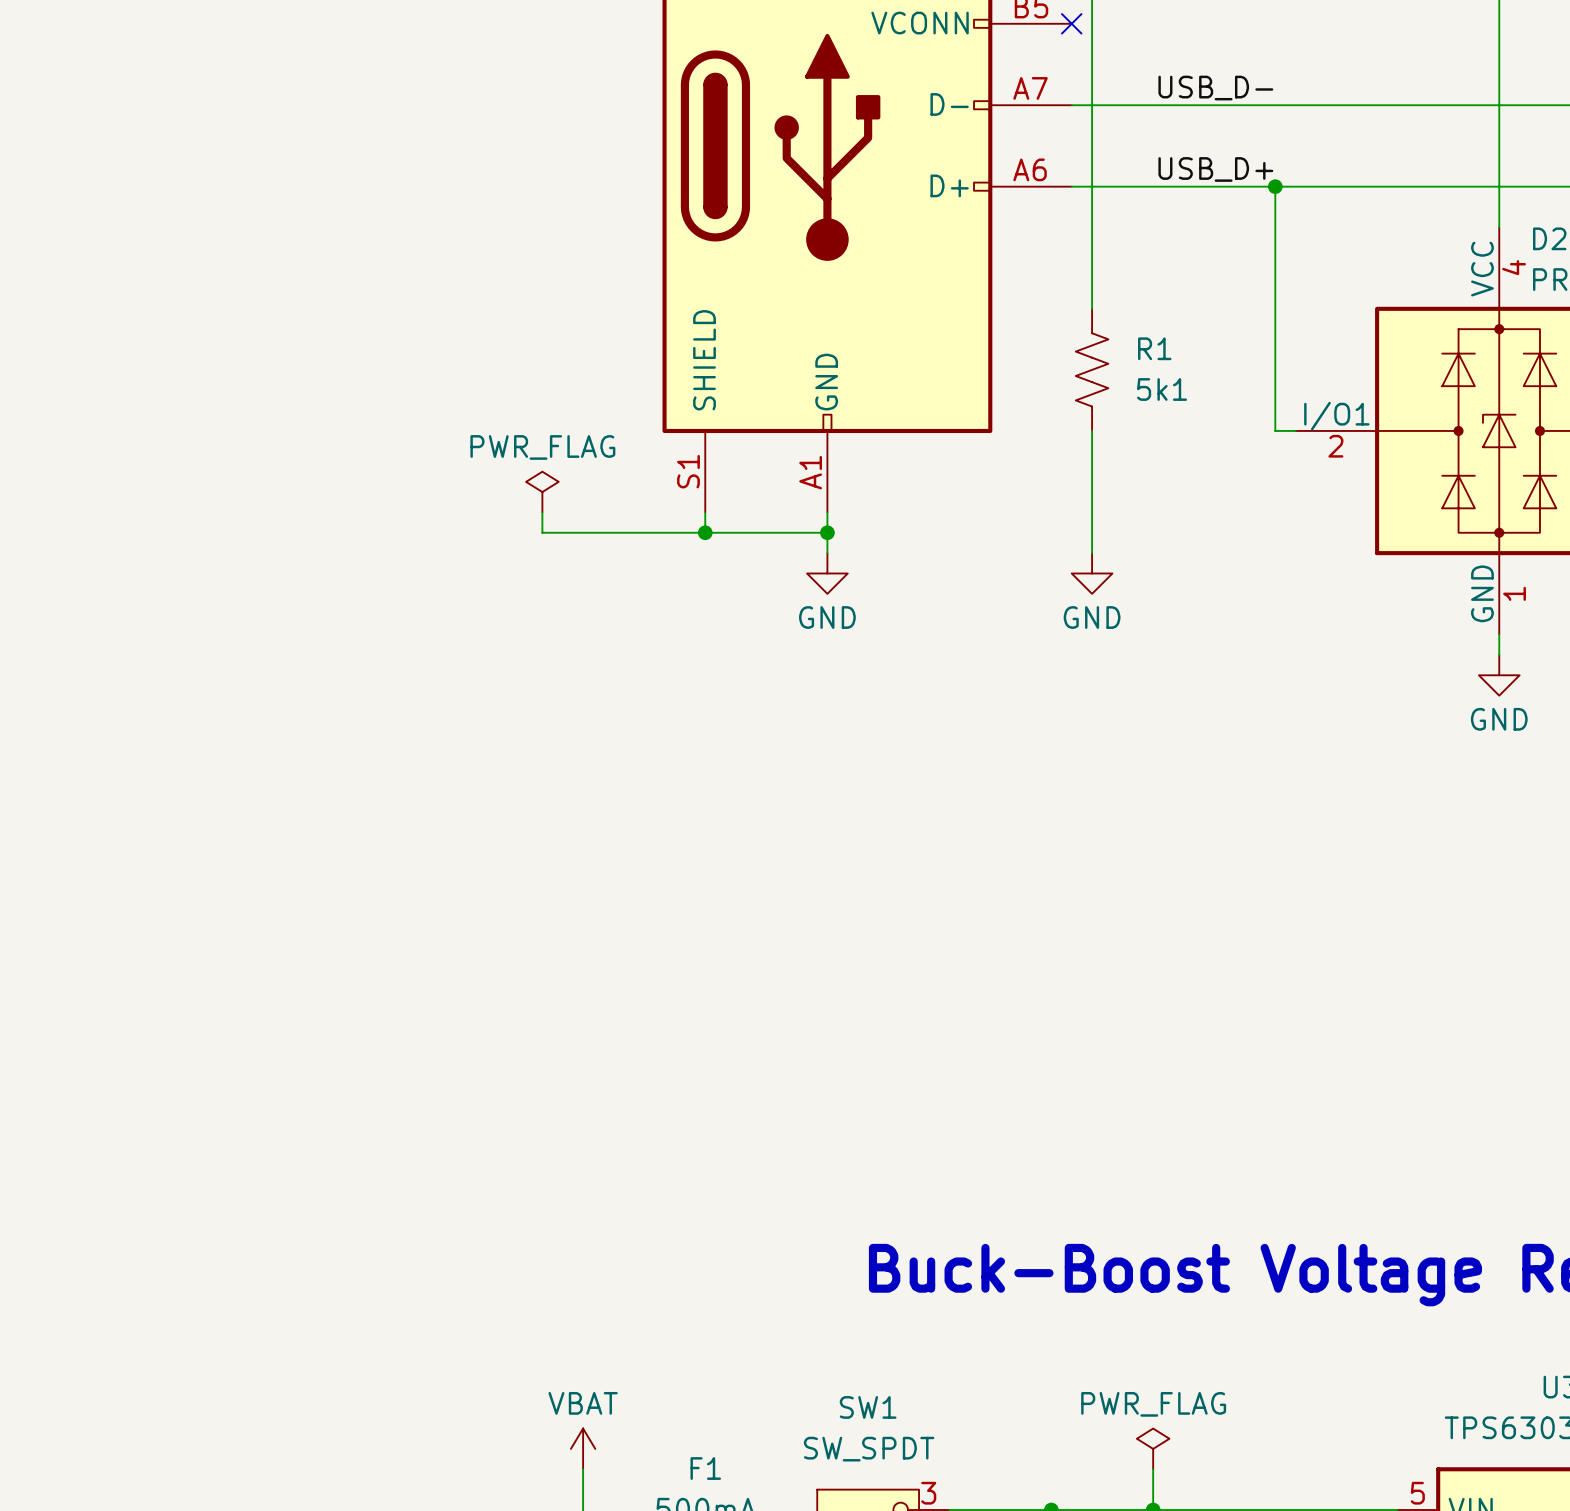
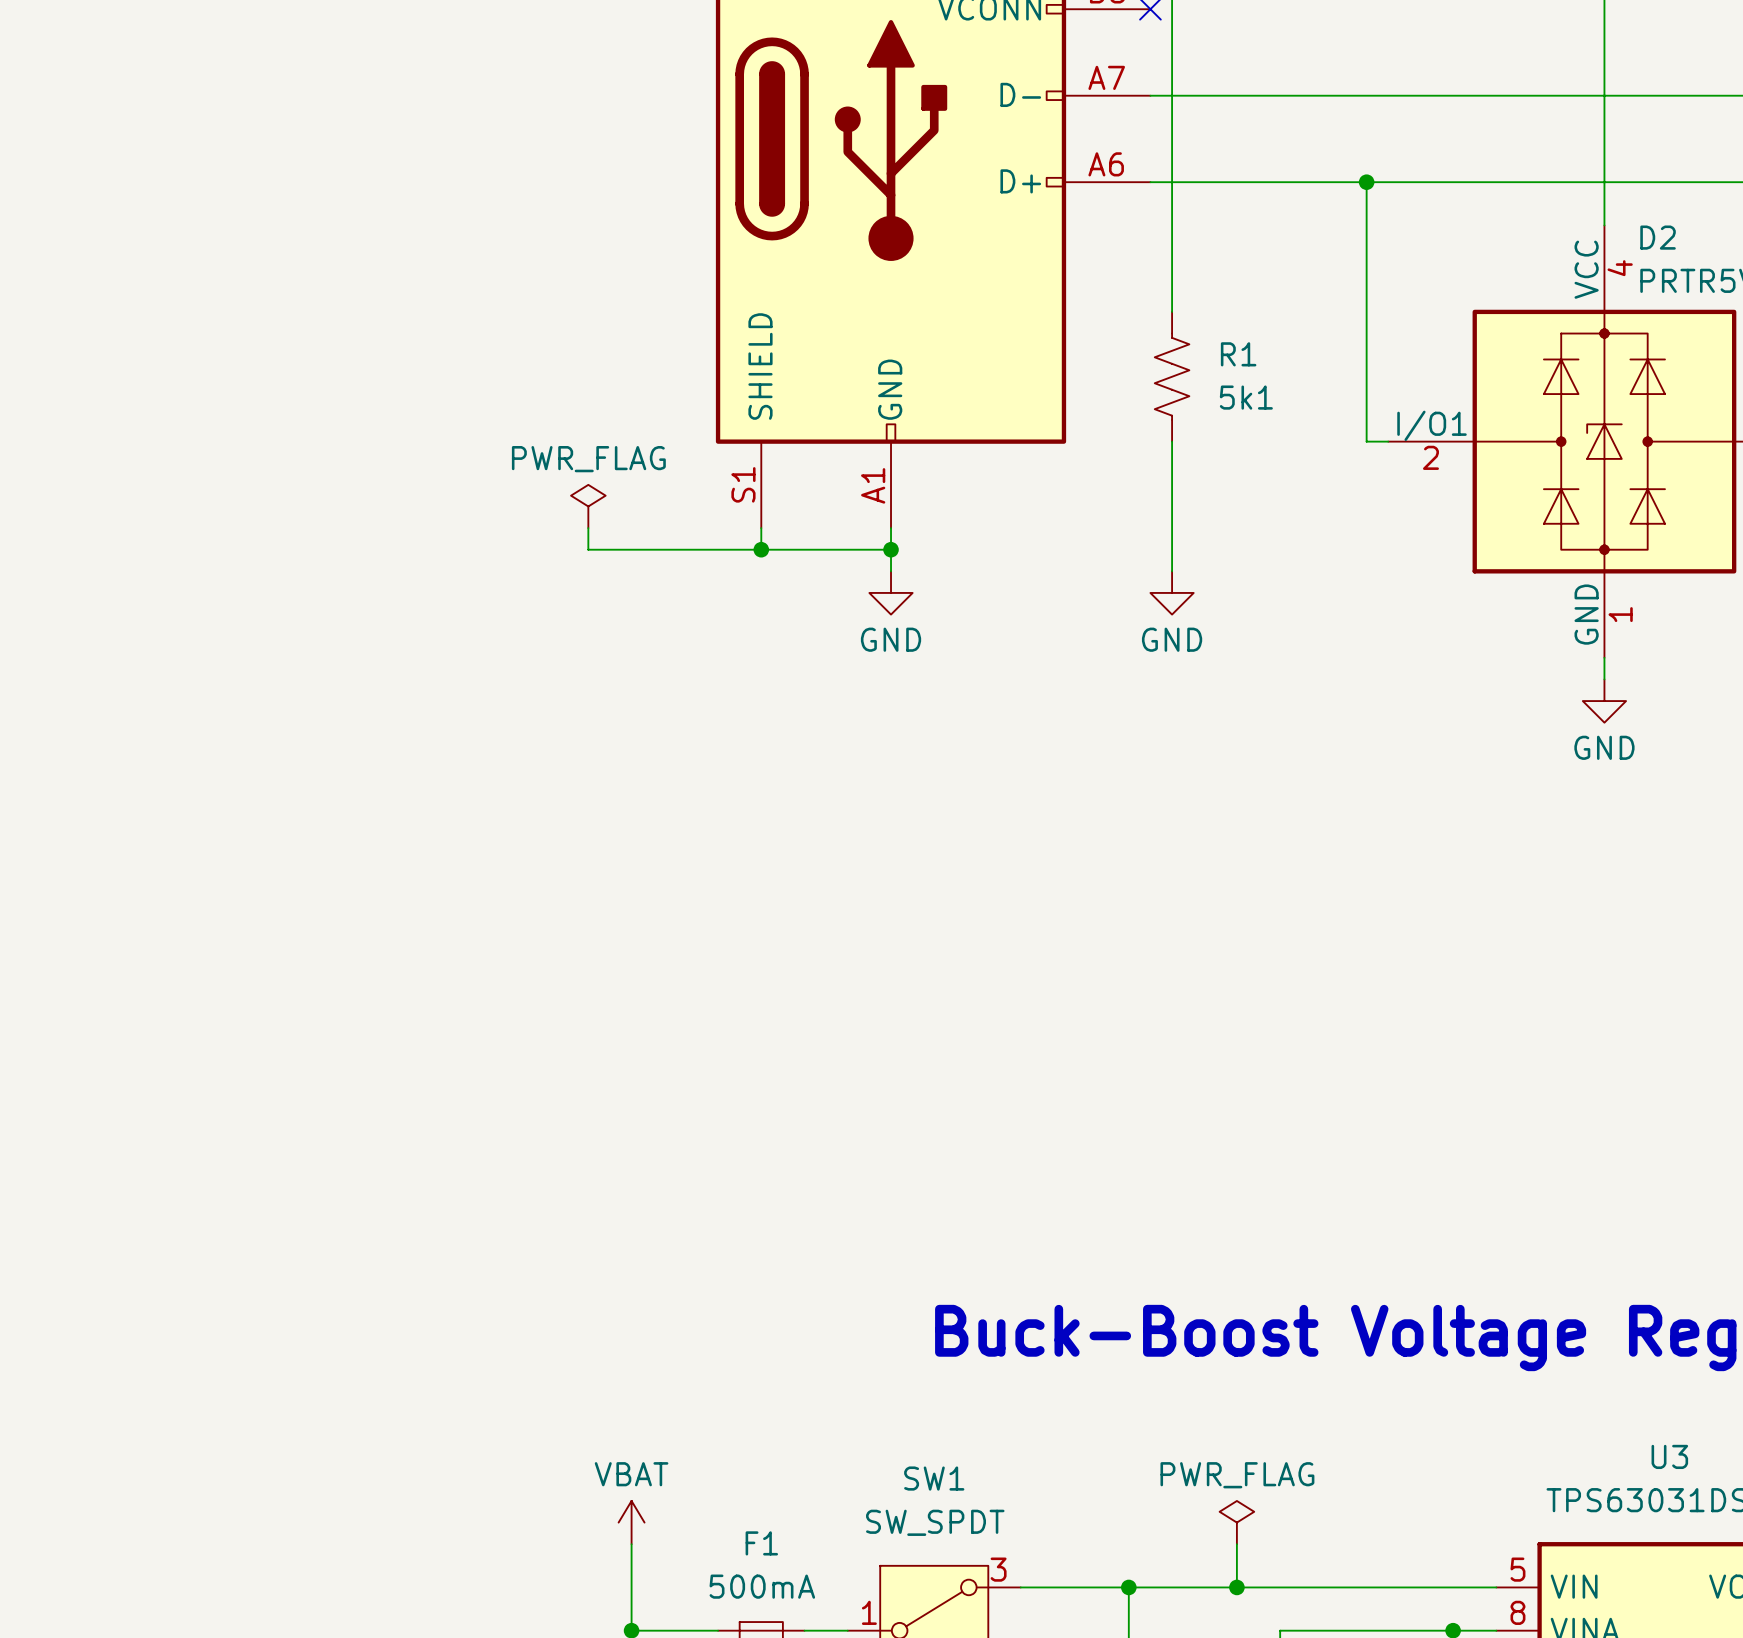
label: USB_D- (1215, 88) -> none
label: USB_D+ (1215, 169) -> none

